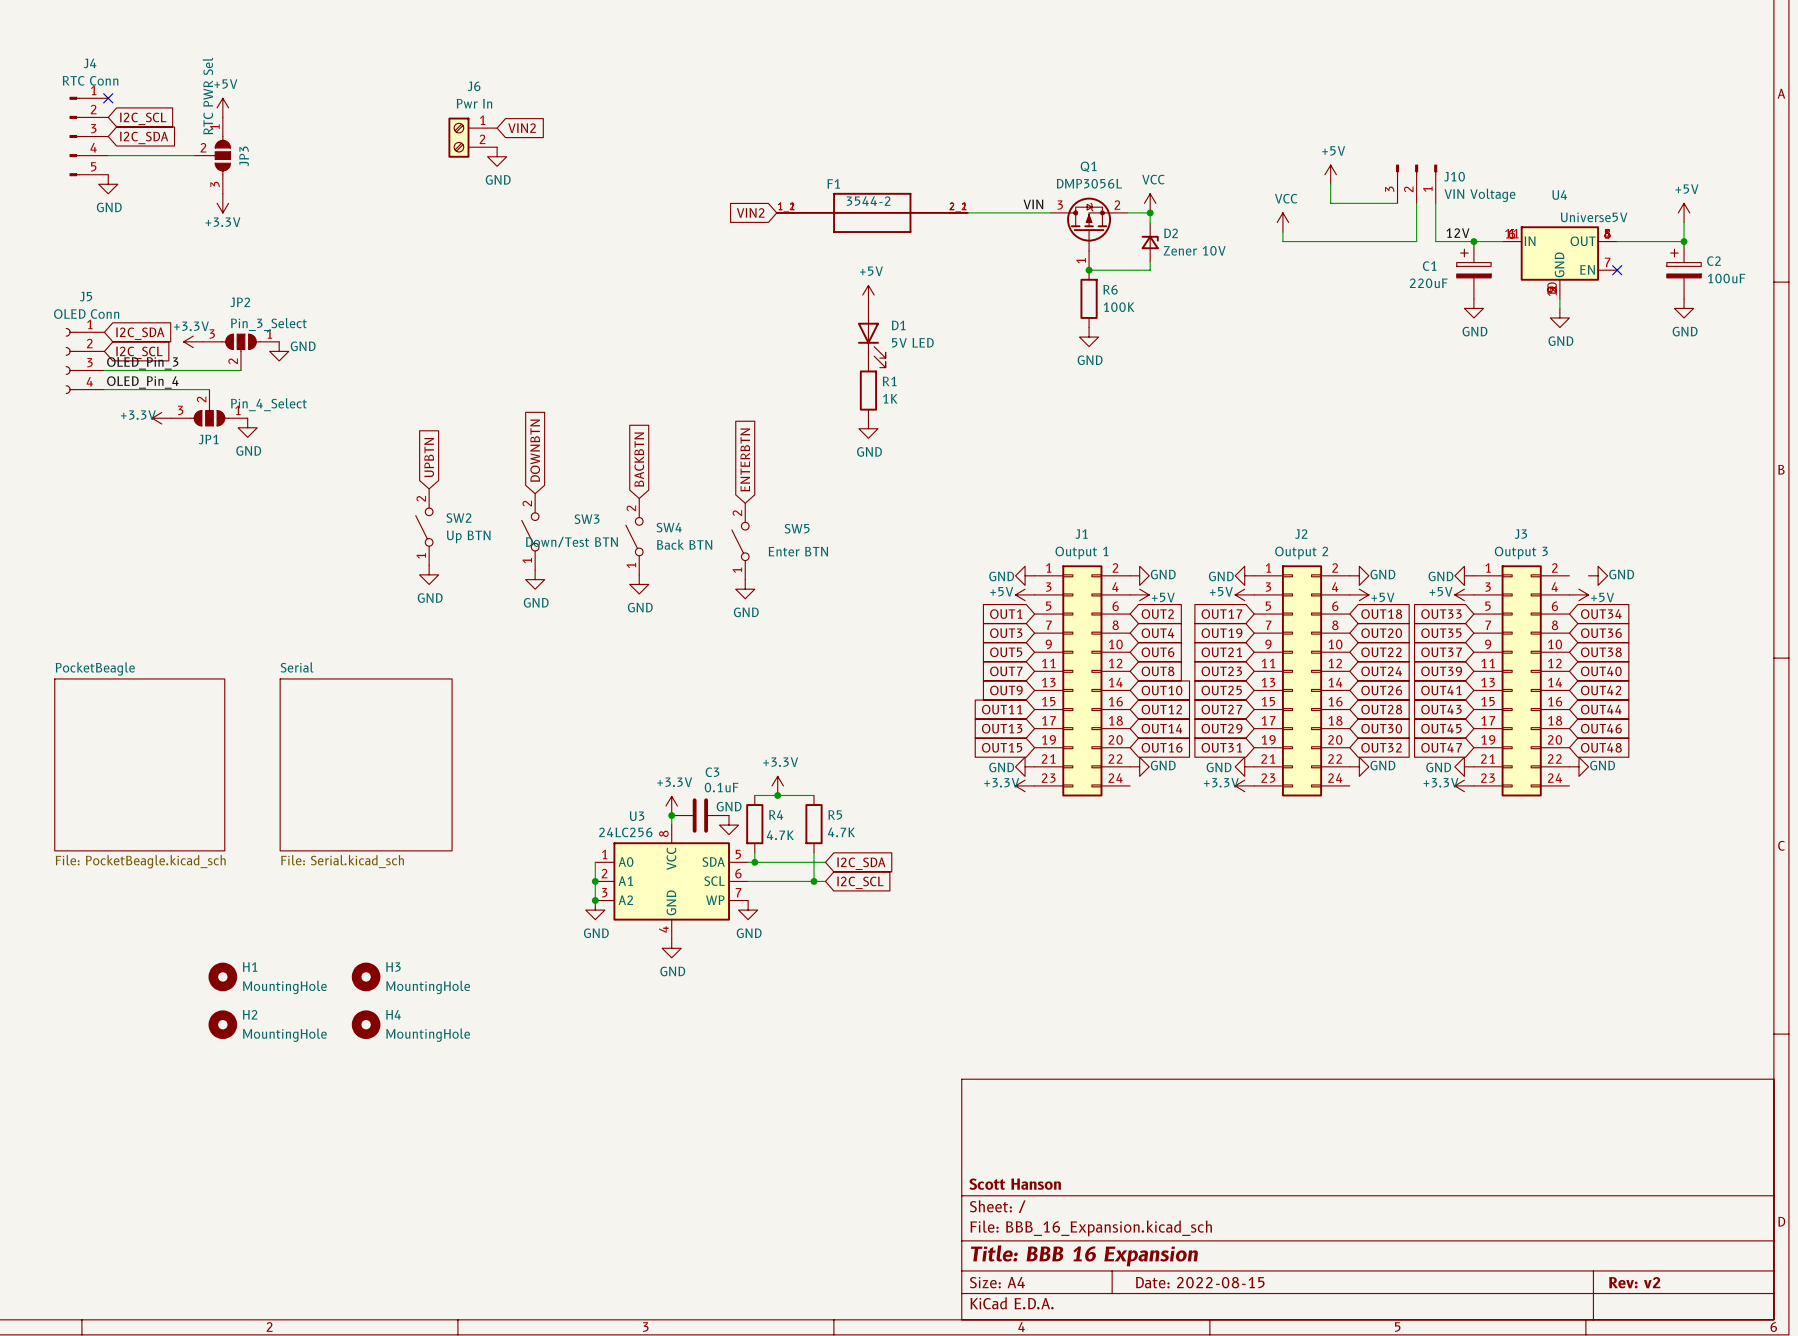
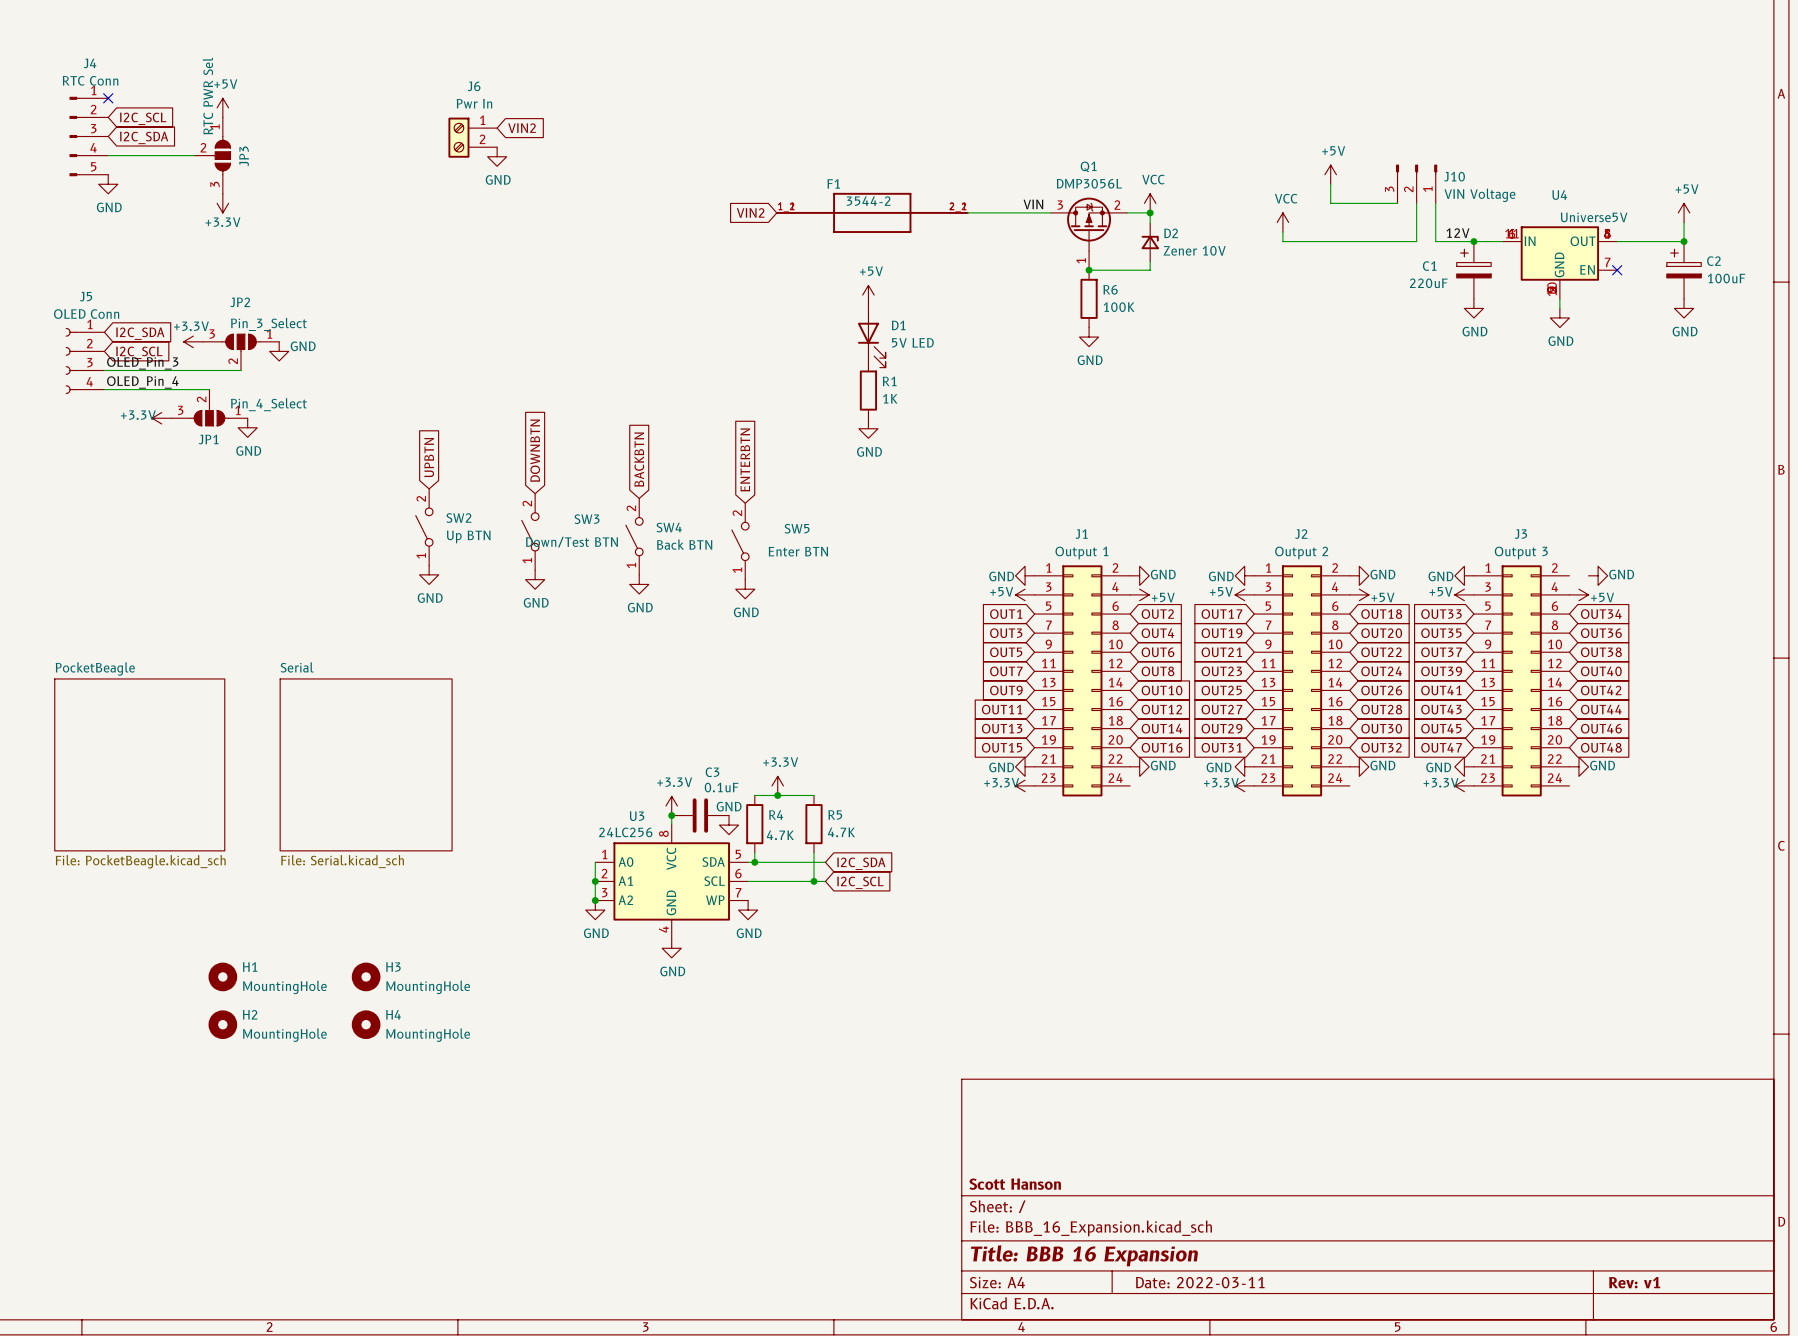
title block: Date: 2022-08-15 (1200, 1282) -> Date: 2022-03-11 (1200, 1282)
title block: Rev: v2 (1634, 1282) -> Rev: v1 (1634, 1282)

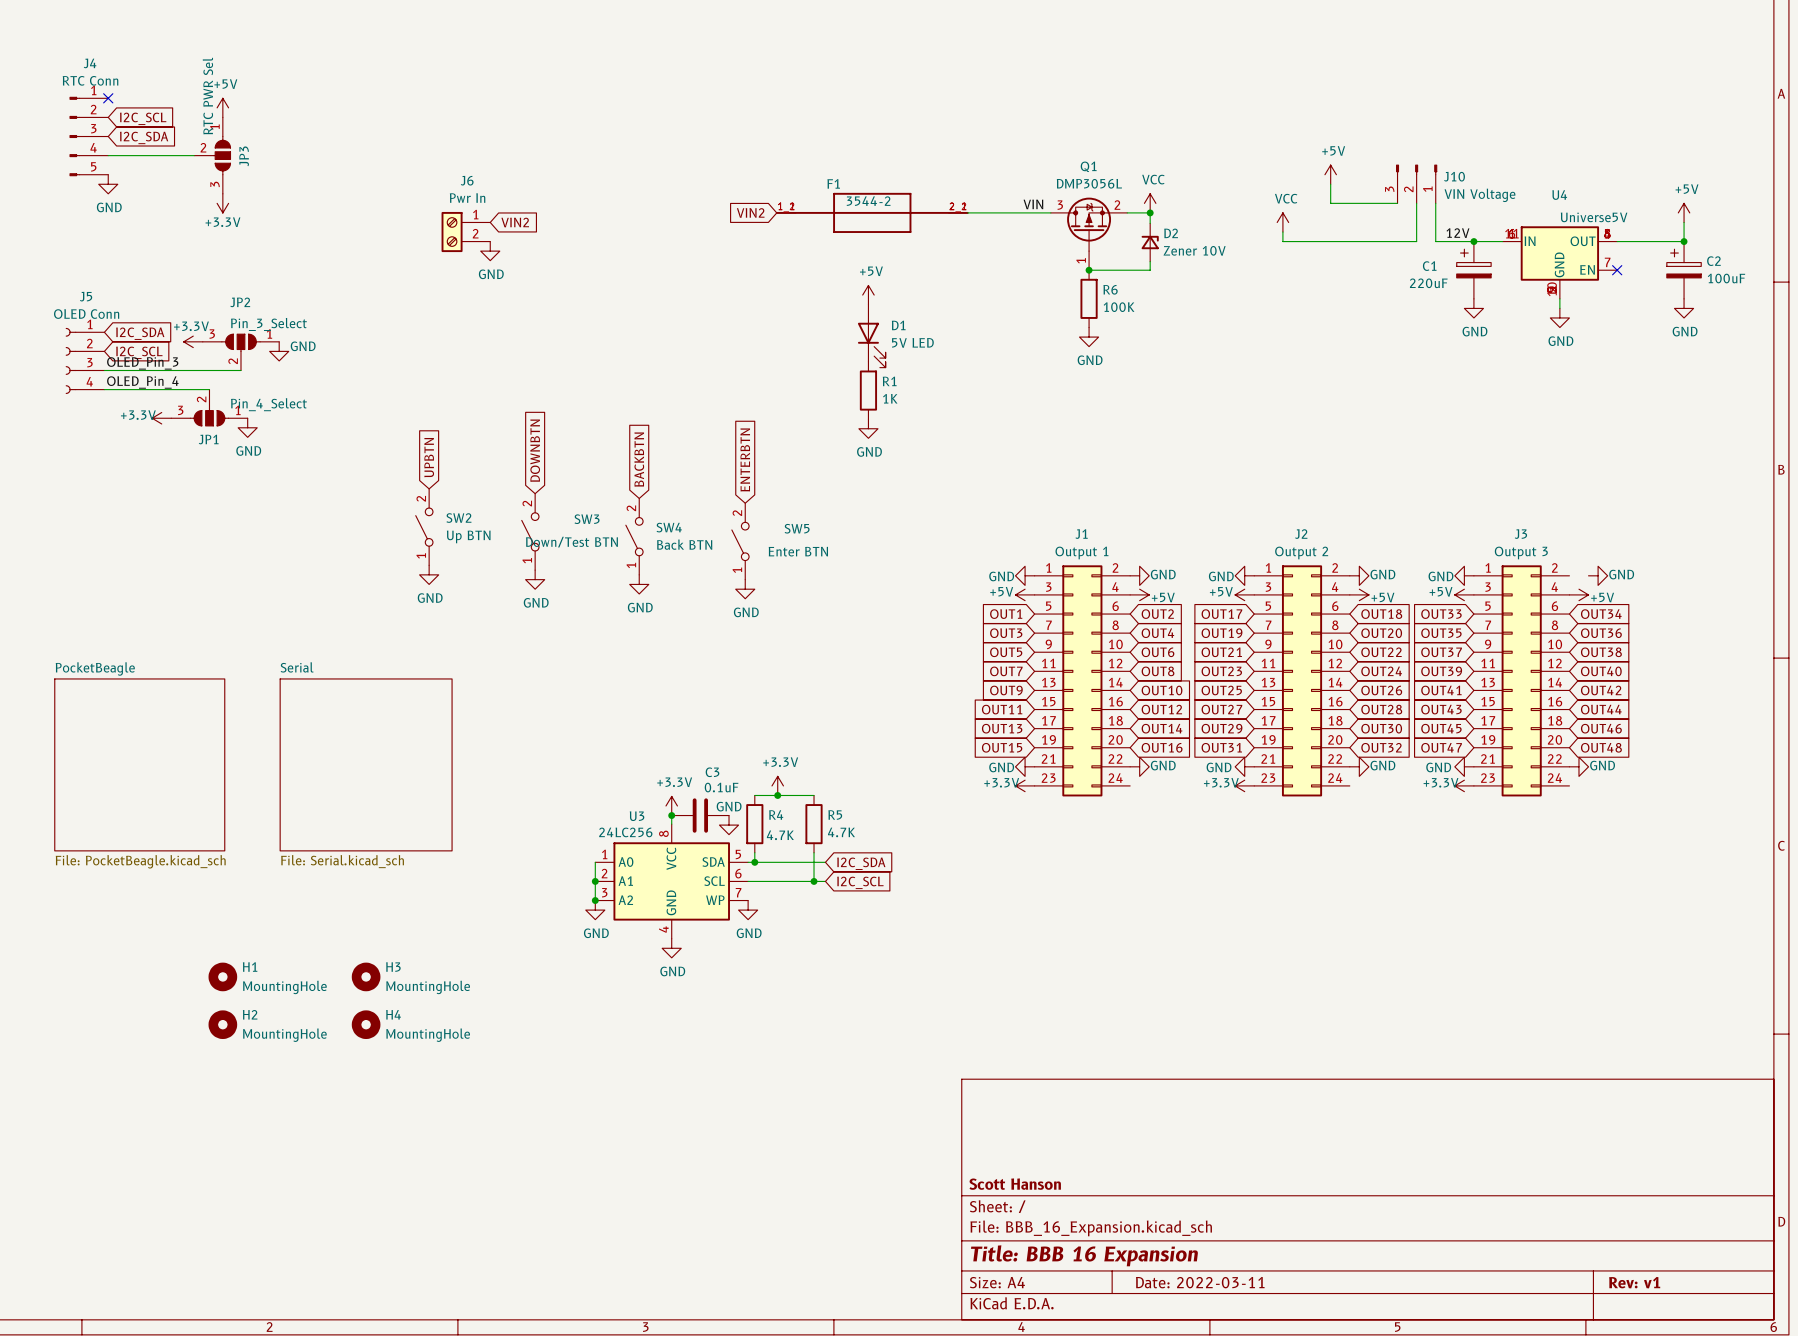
global label position: VIN2 (522, 128) -> VIN2 (515, 222)
J6 position: (472, 137) -> (465, 232)
power symbol position: GND (497, 156) -> GND (490, 251)

